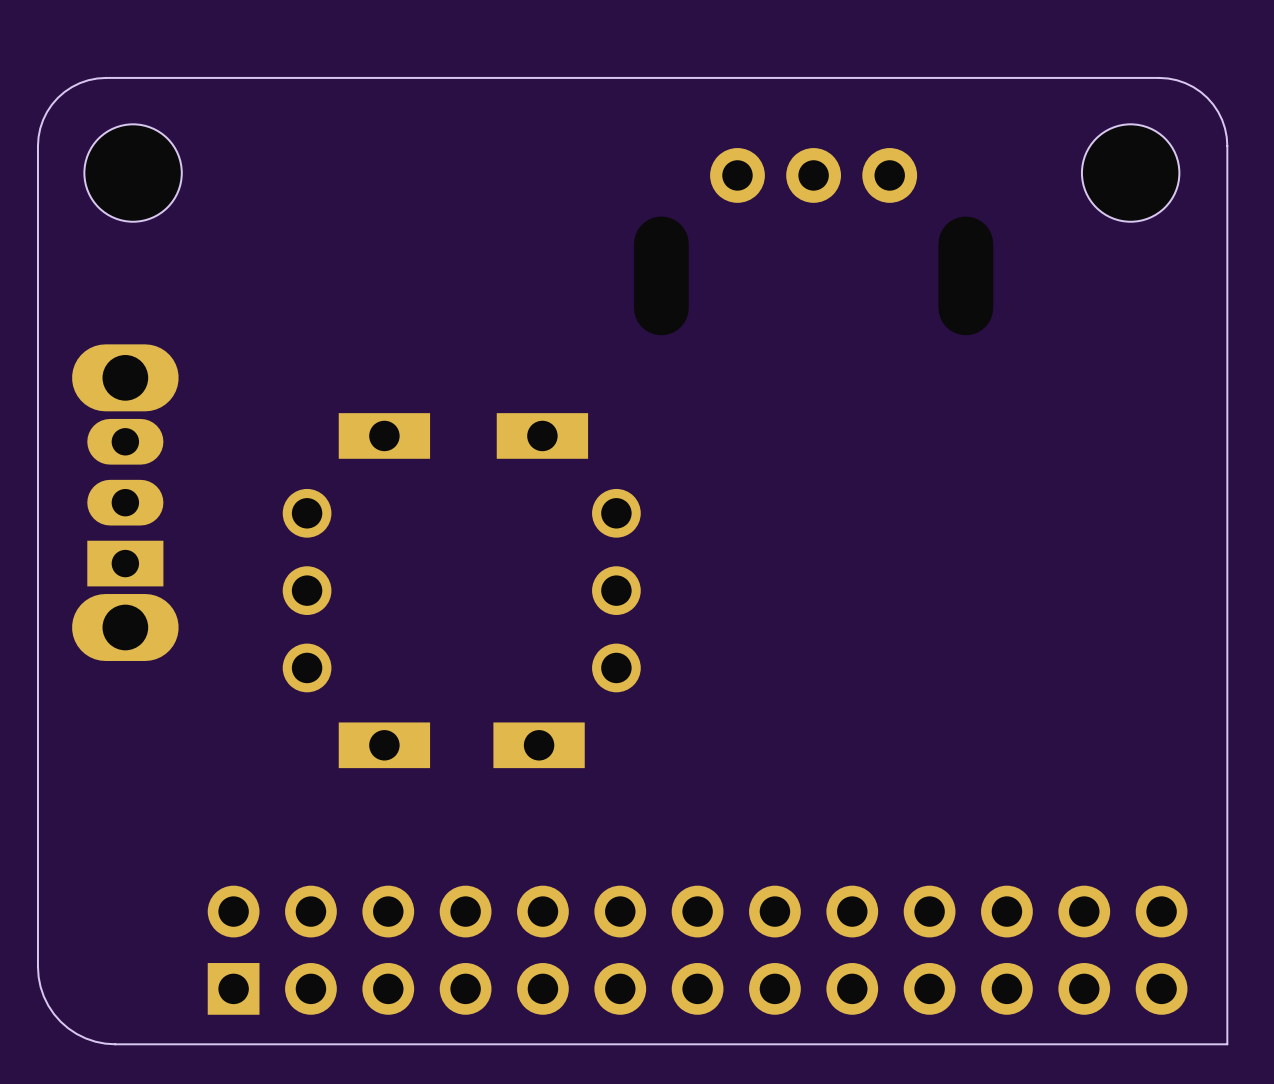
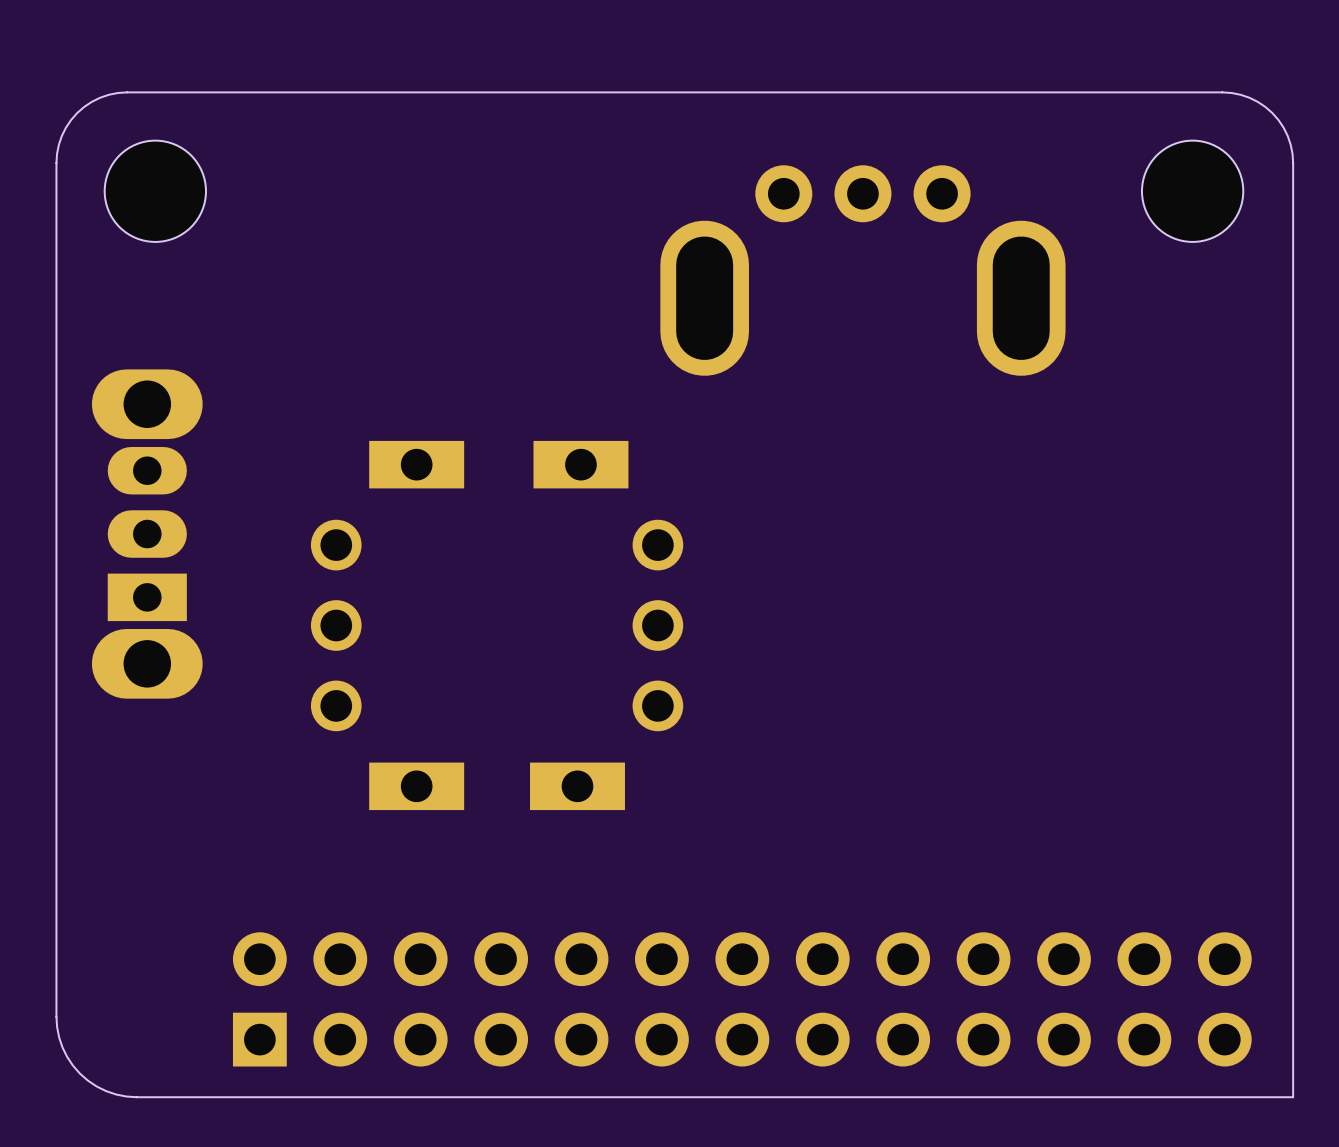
part footprint: [633, 148, 994, 336] -> [660, 165, 1066, 376]

